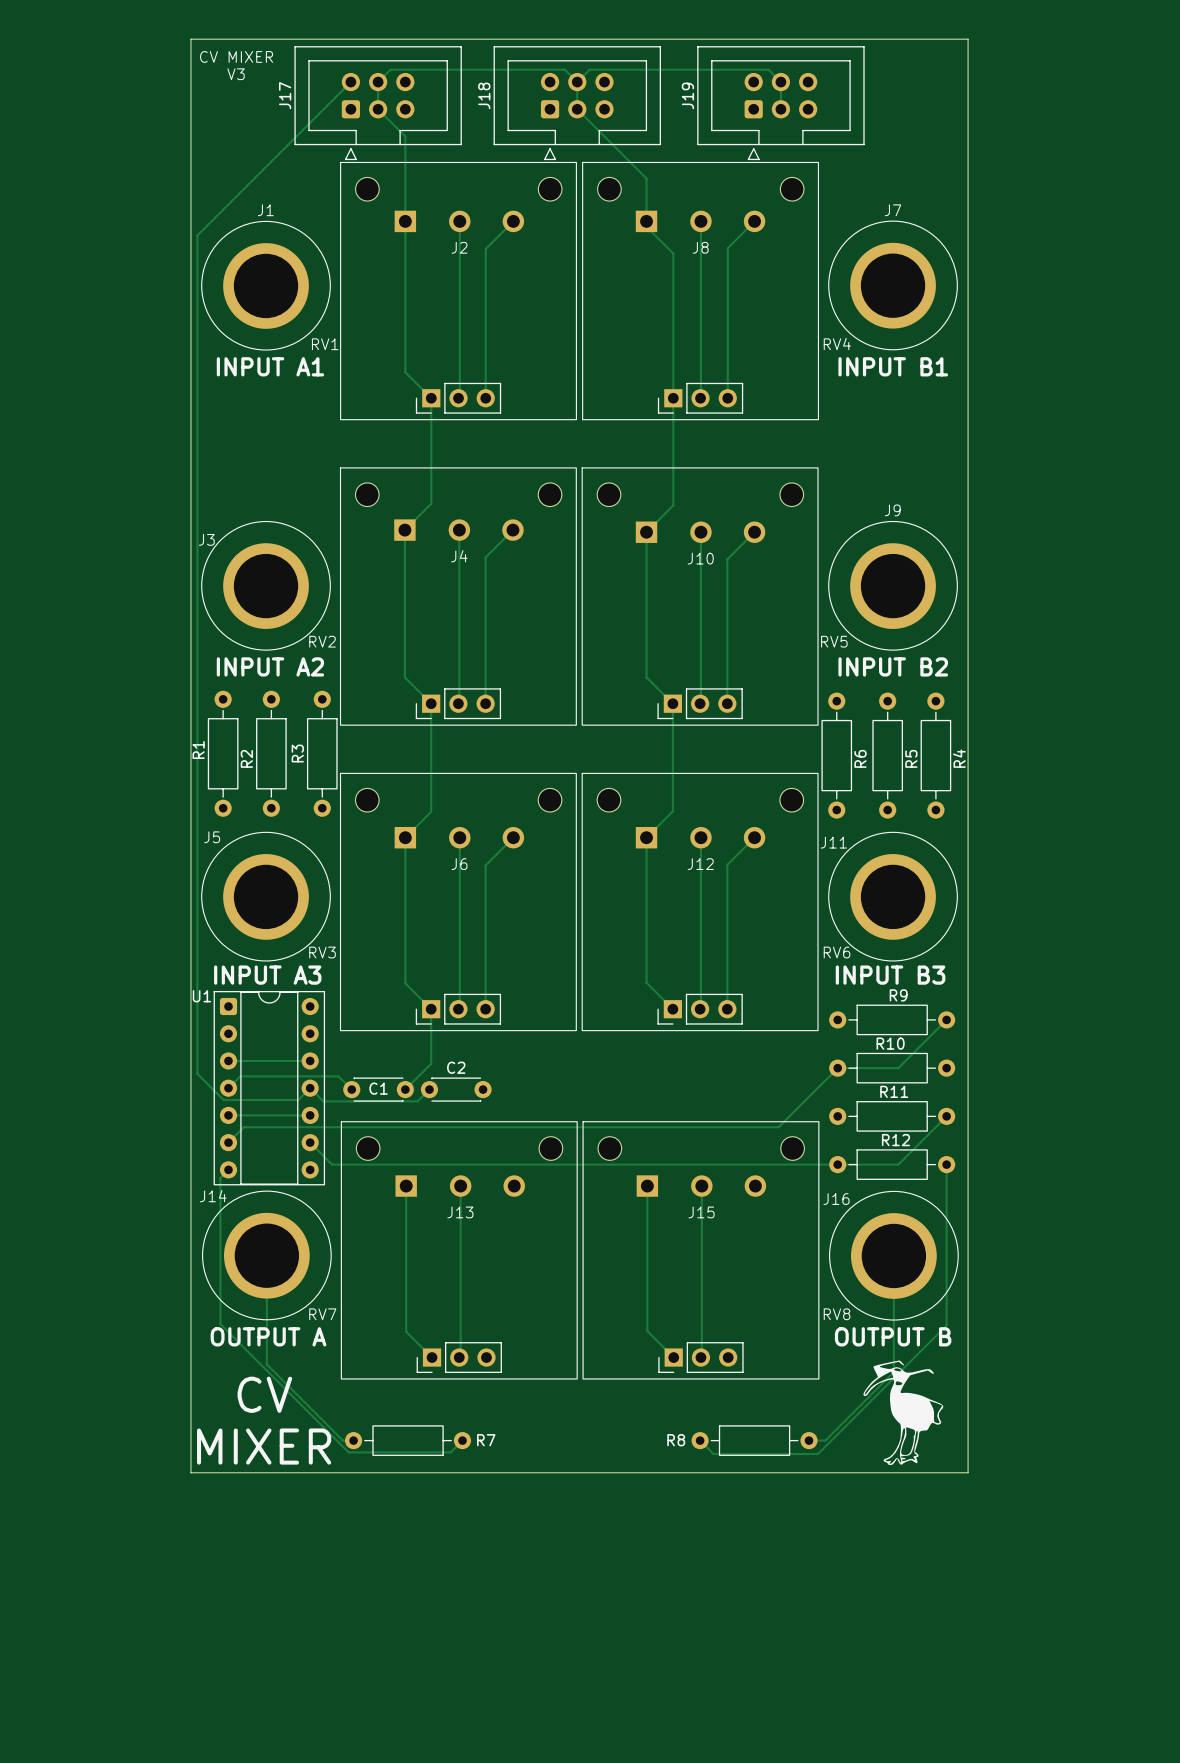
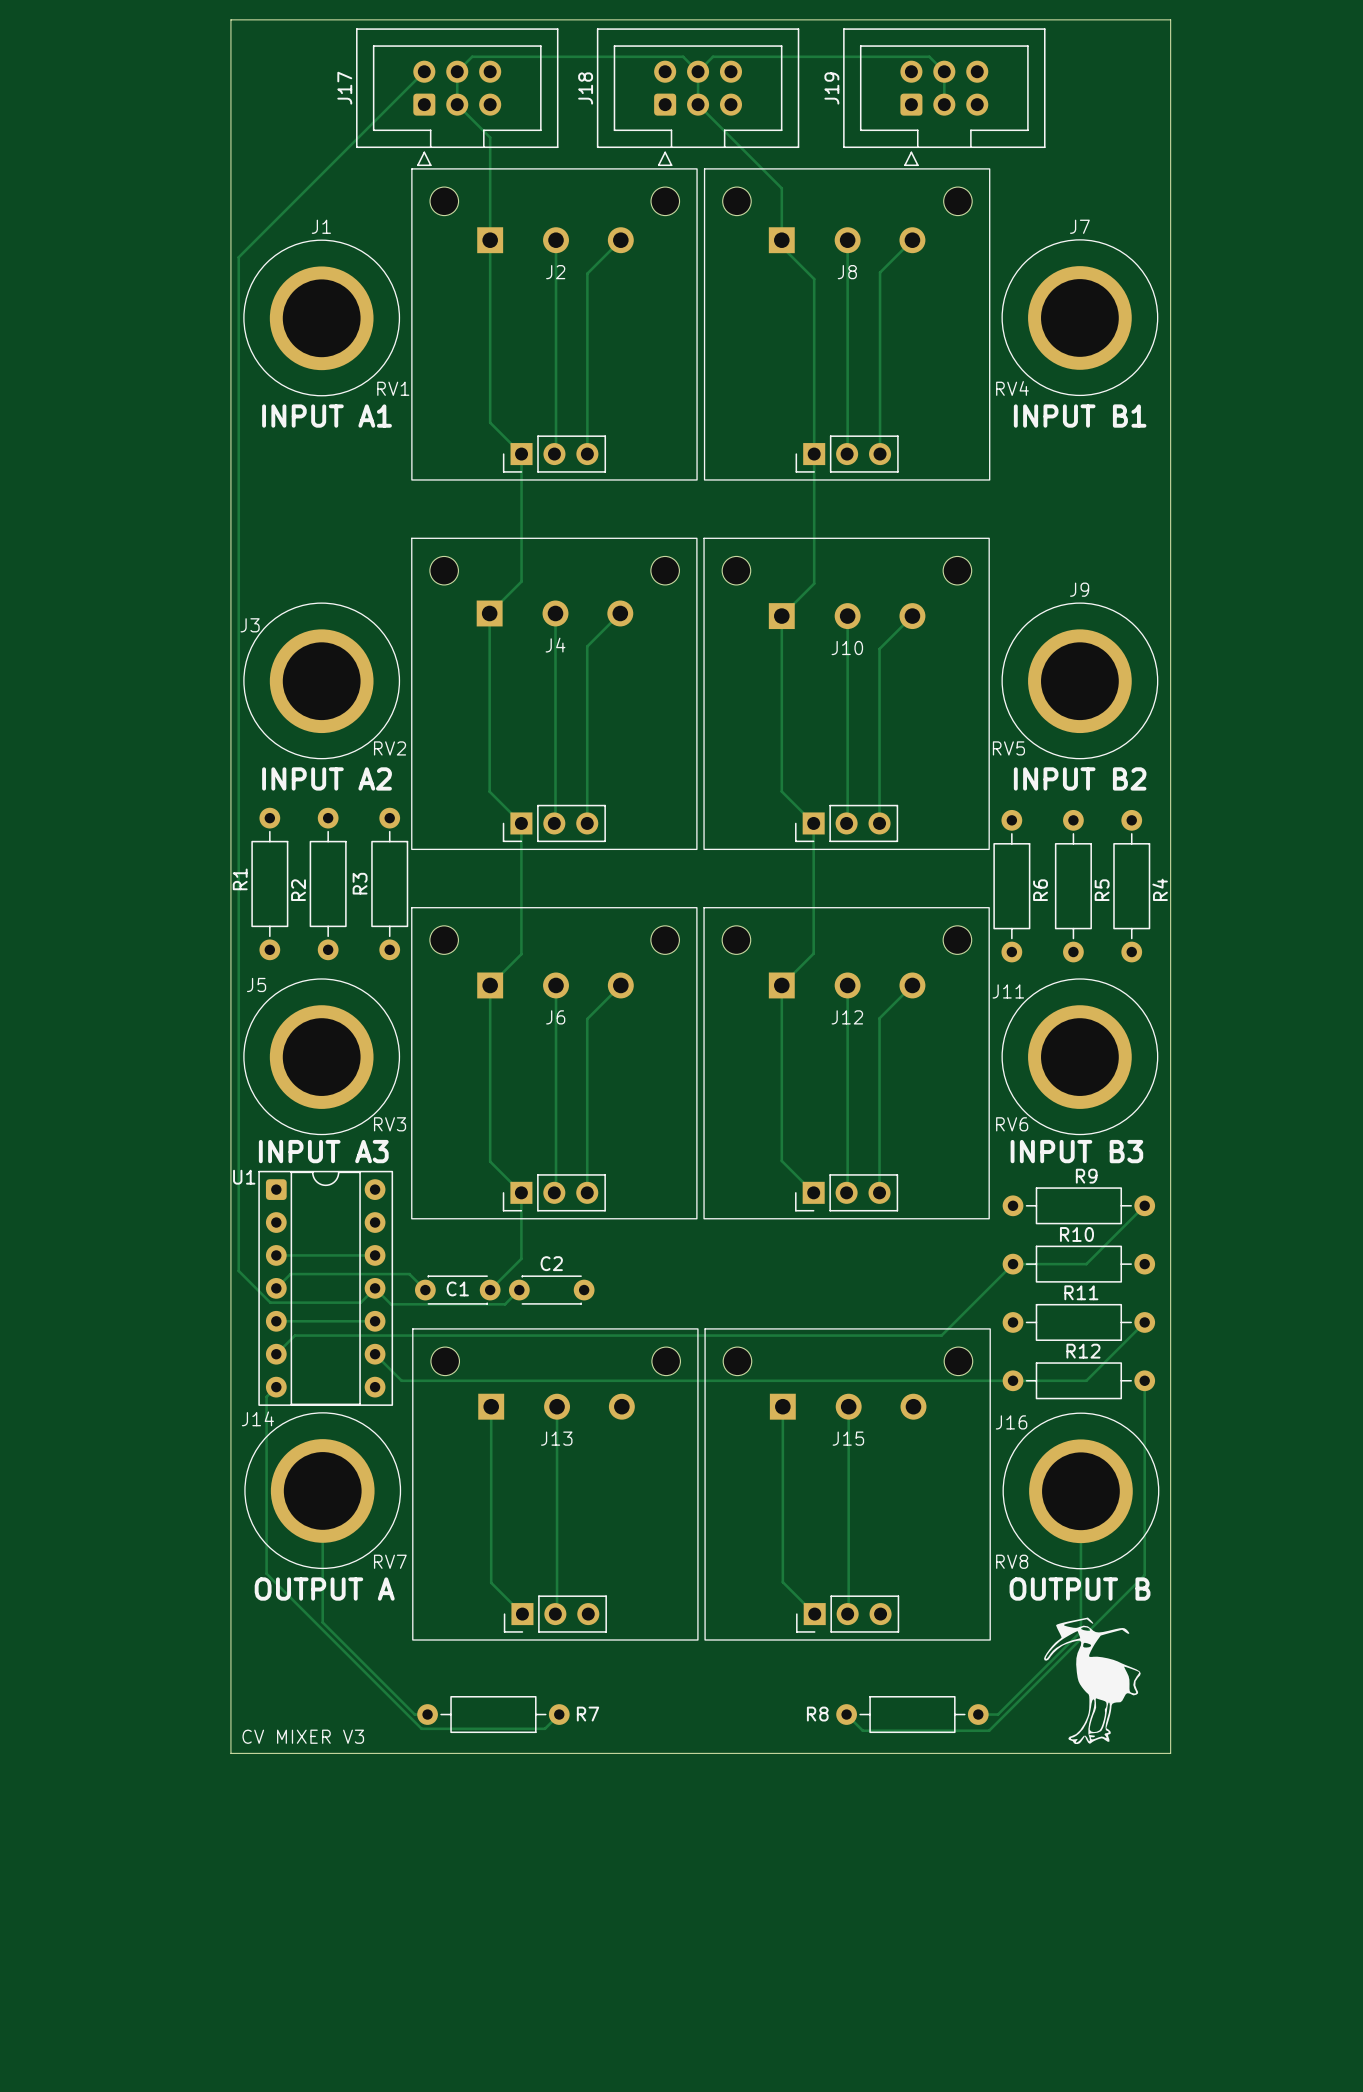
text: CV MIXER (236, 56) -> none
text: V3 (236, 74) -> none
text: CV (264, 1394) -> none
text: MIXER (264, 1446) -> CV MIXER V3 (303, 1736)

